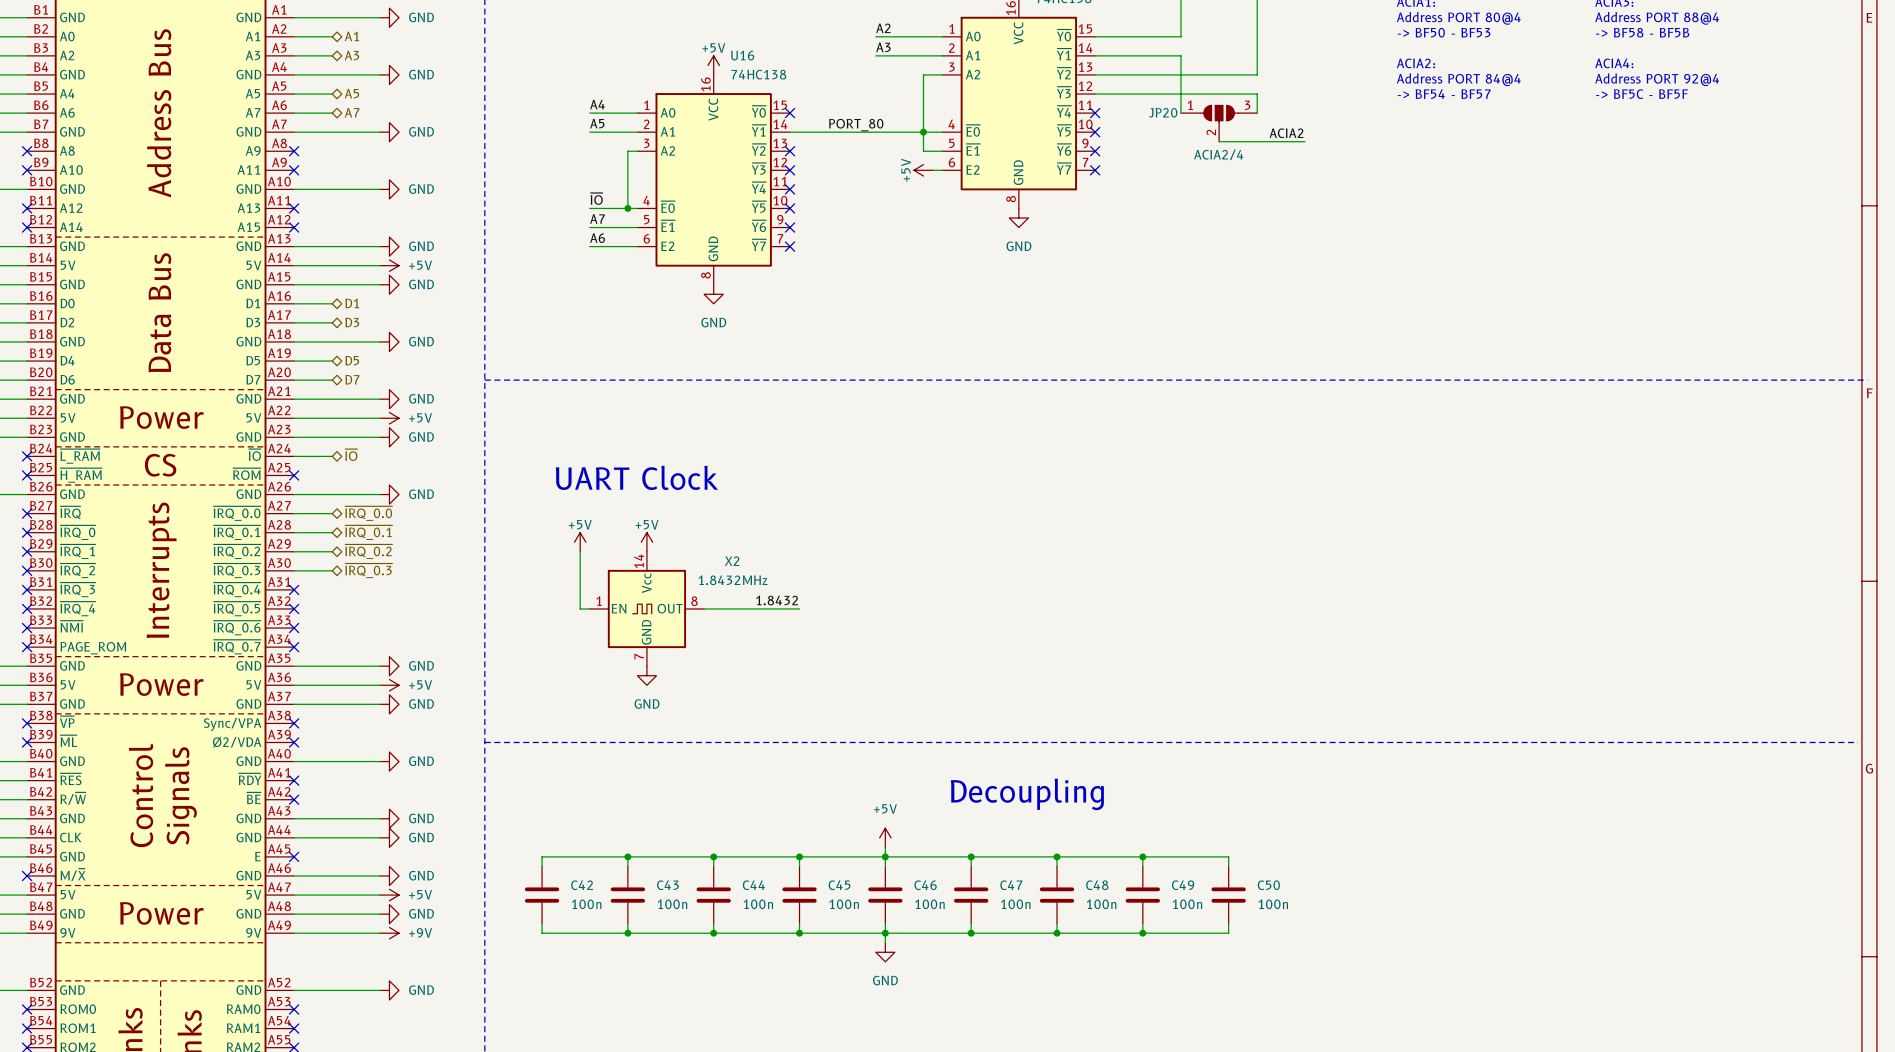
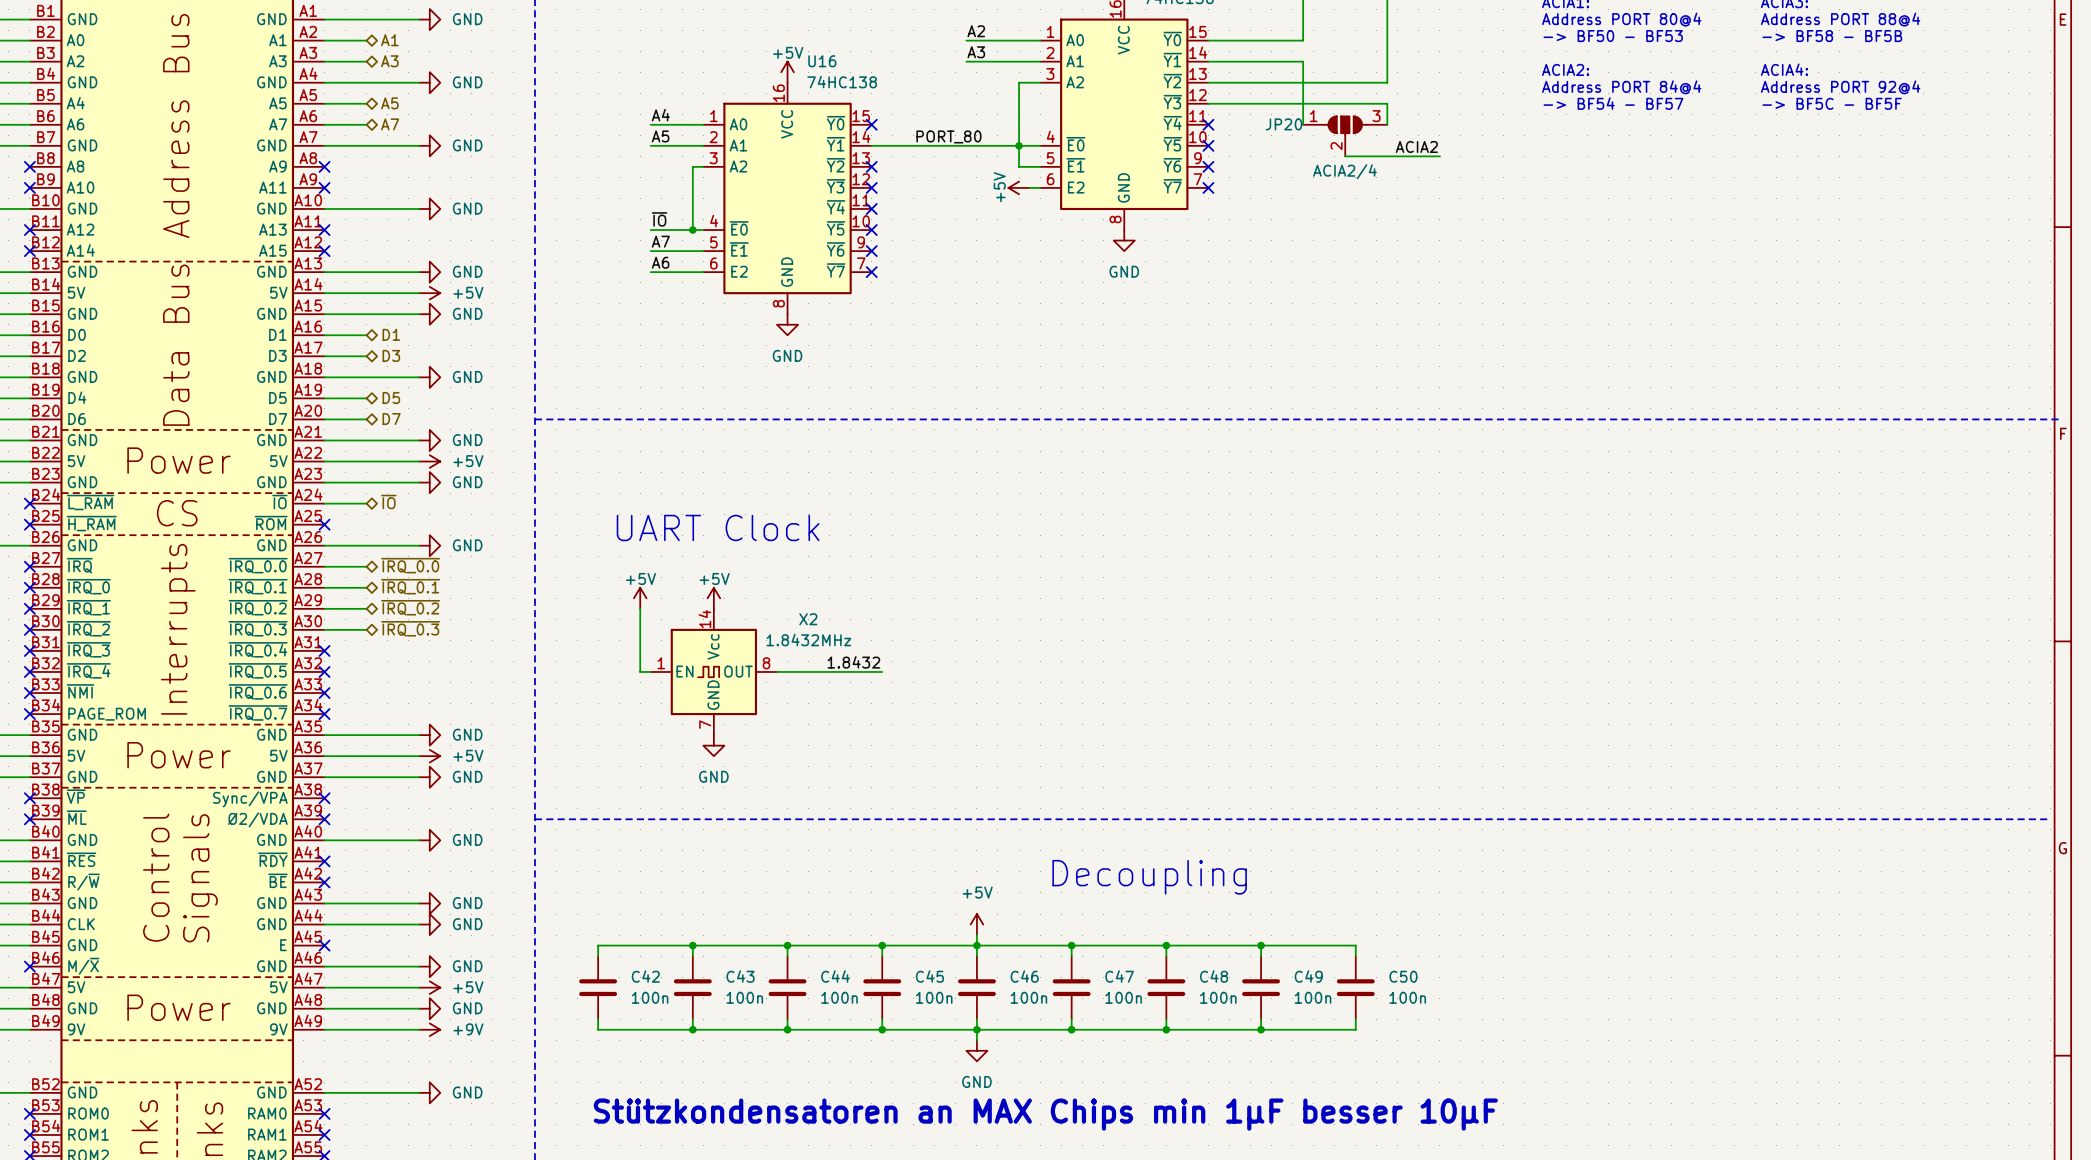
text: none -> Stützkondensatoren an MAX Chips min 1µF besser 10µF (1045, 1114)

